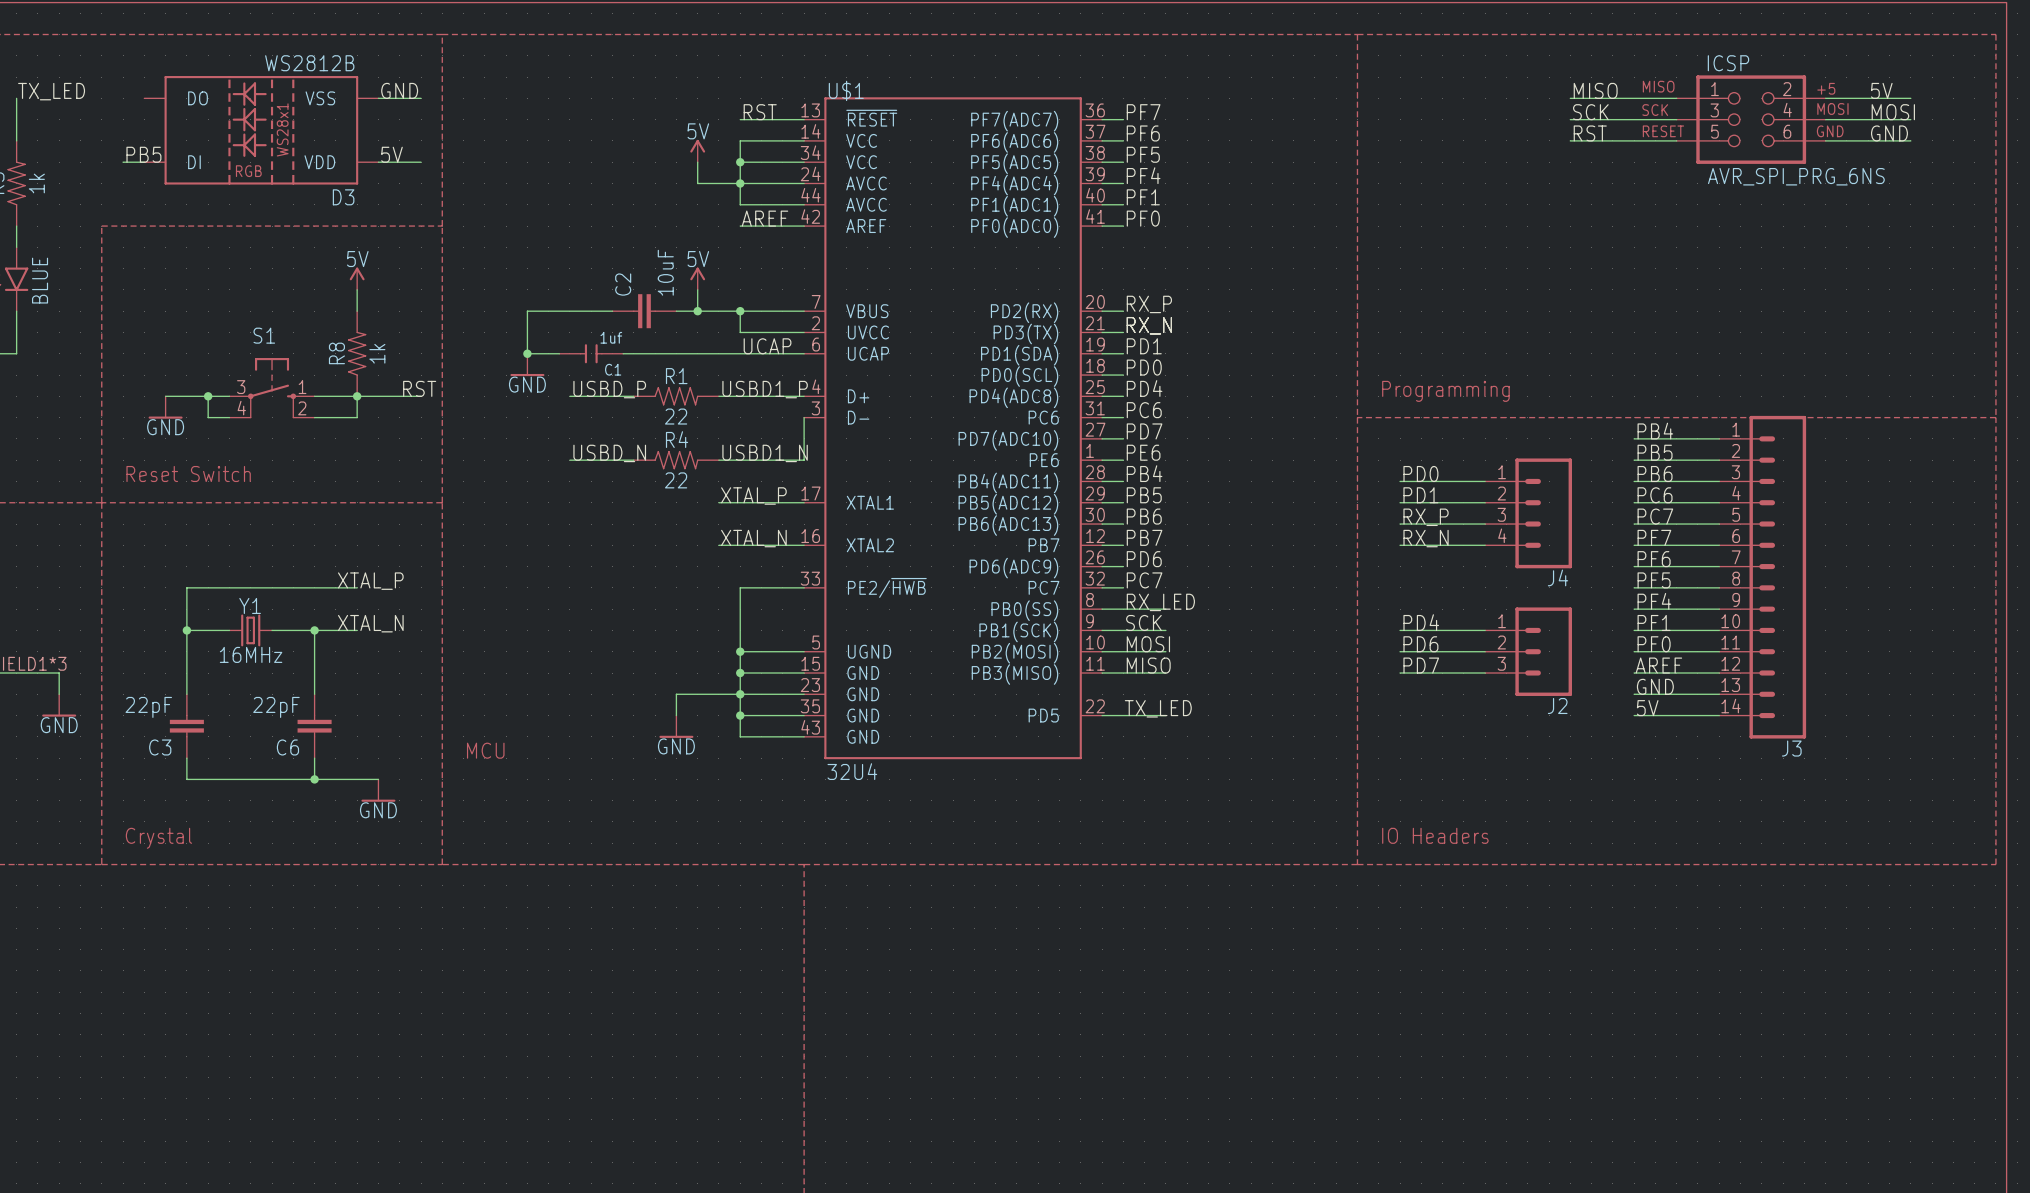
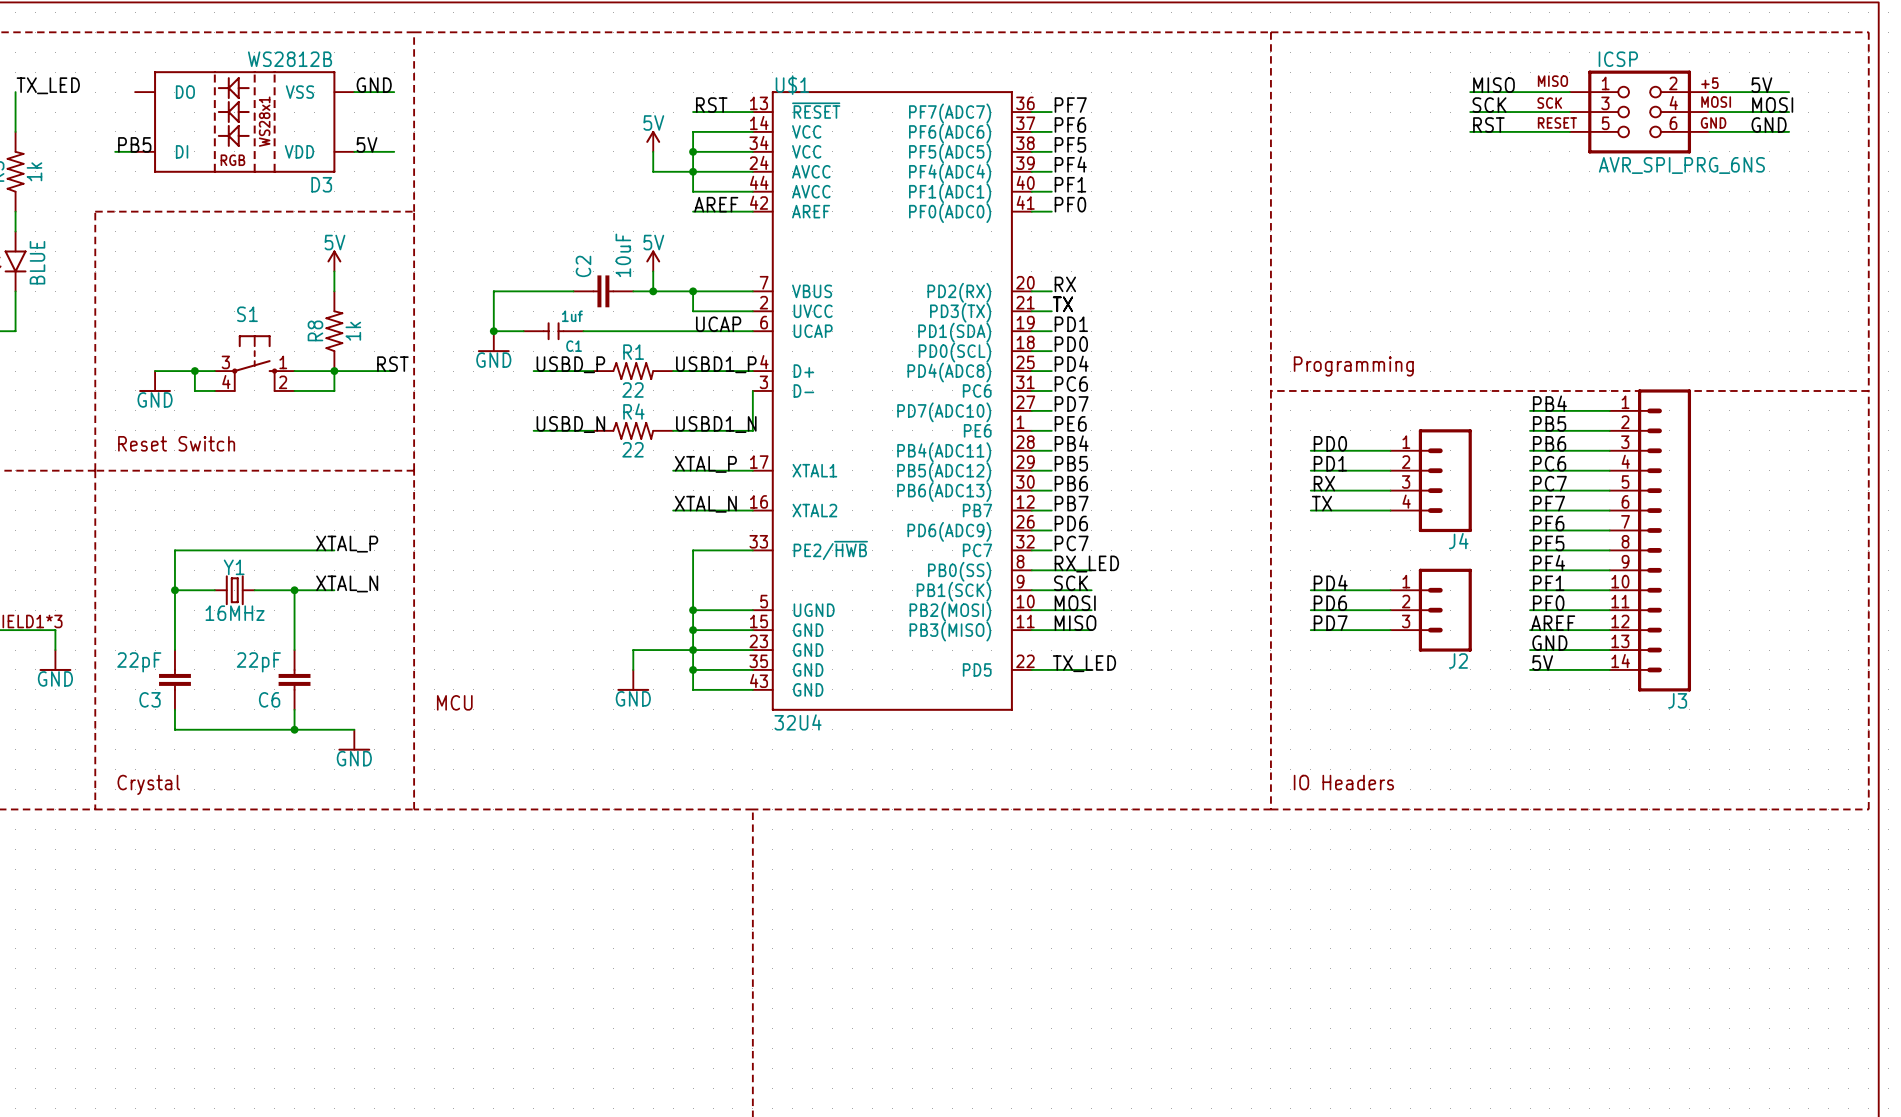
label: RX_P (1149, 304) -> RX (1065, 284)
label: RX_N (1149, 325) -> TX (1062, 304)
label: RX_P (1426, 517) -> RX (1324, 483)
label: RX_N (1426, 538) -> TX (1322, 503)

